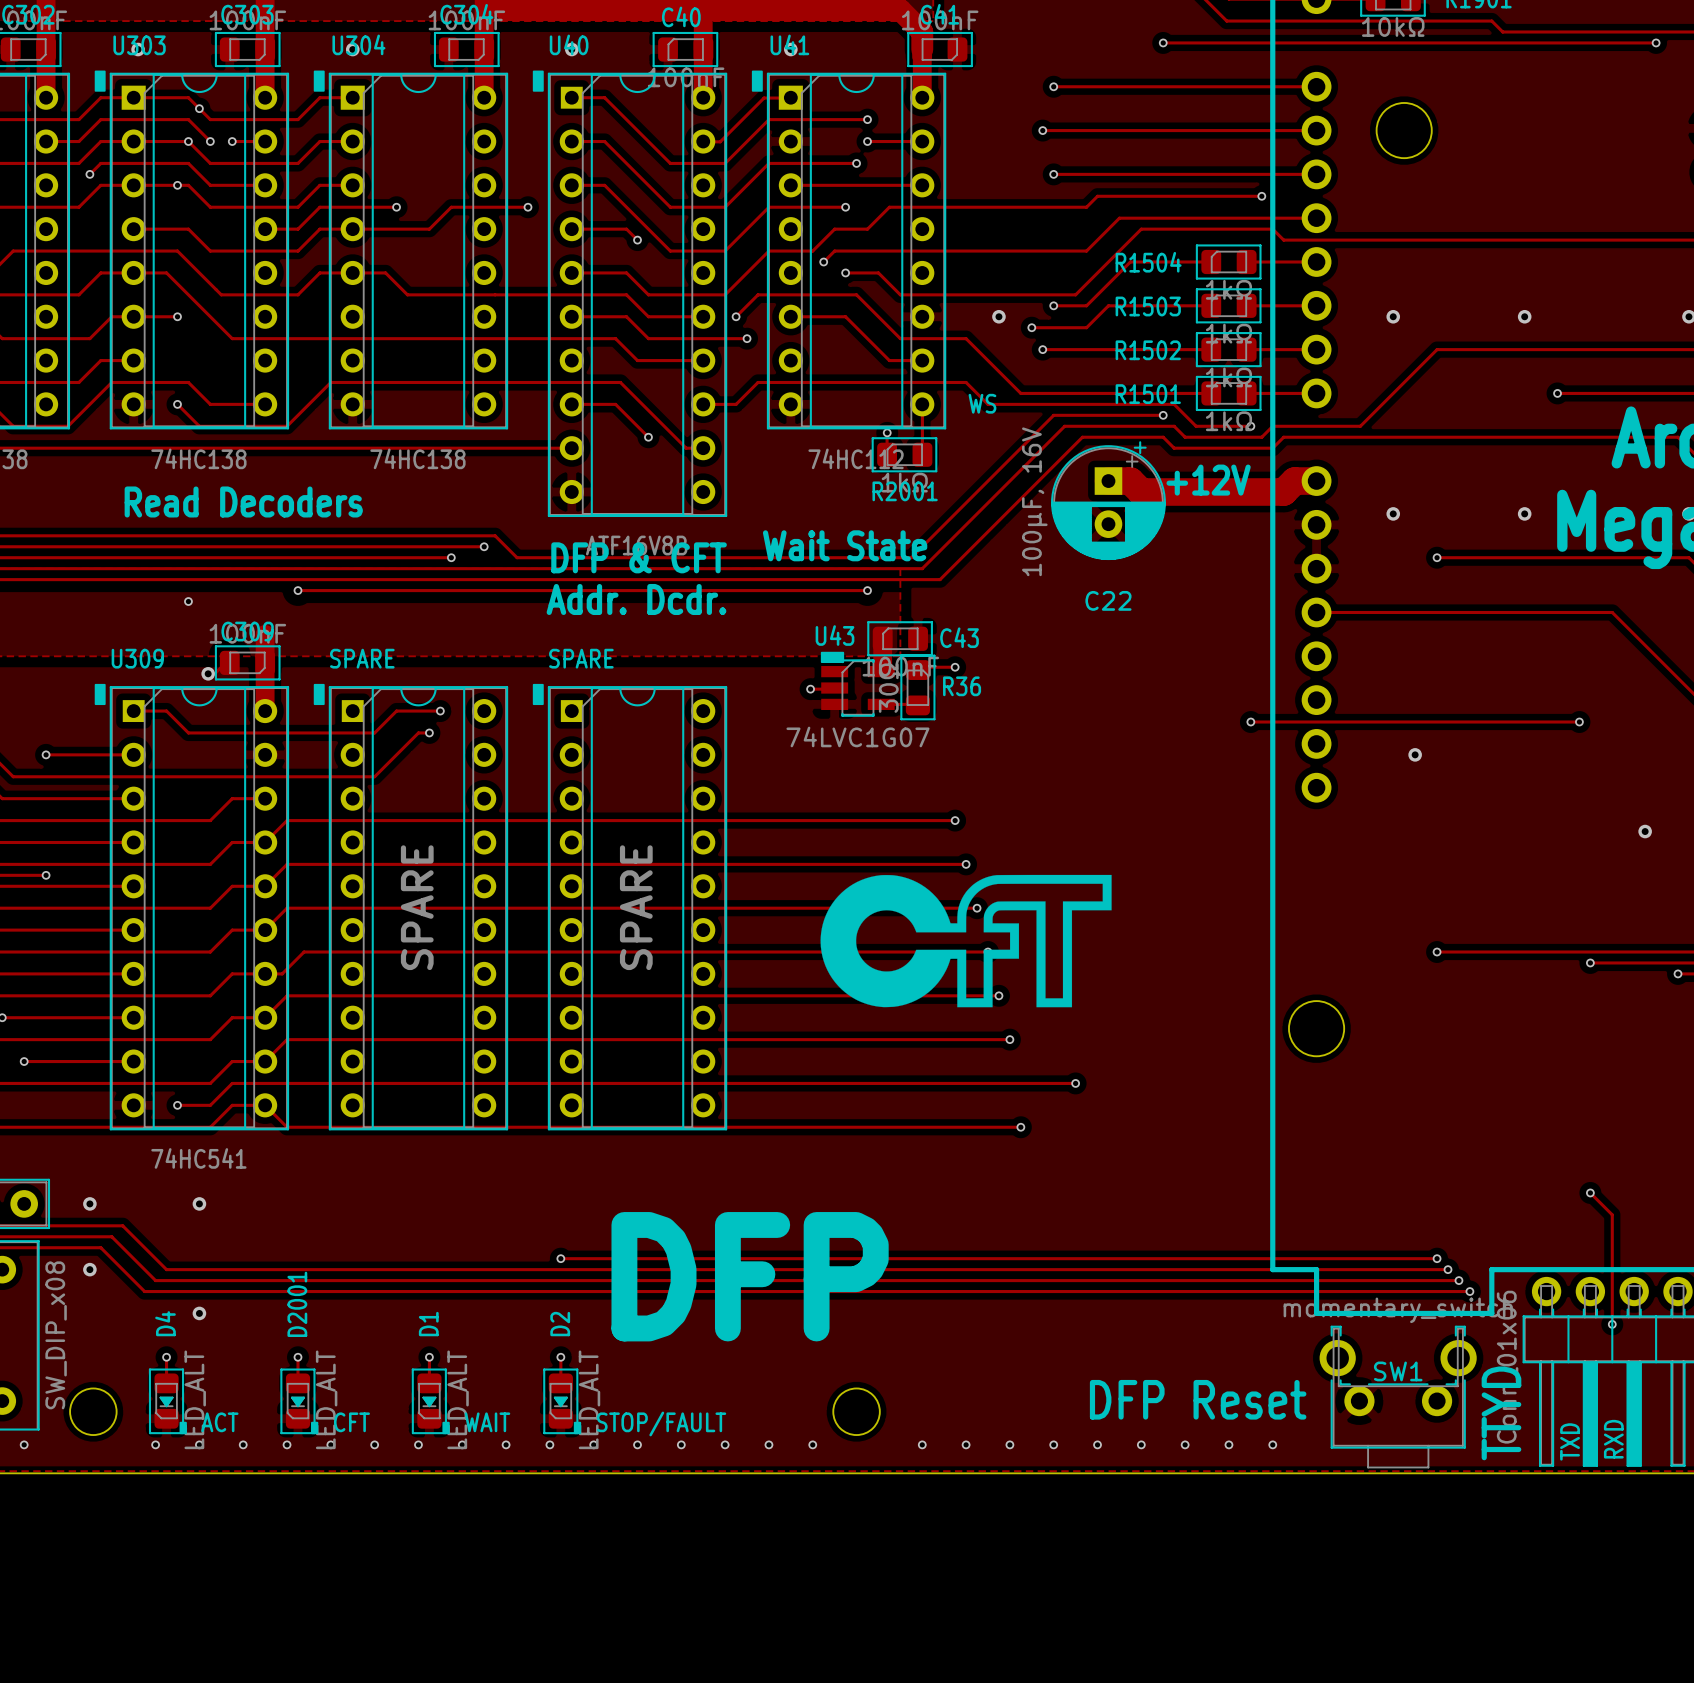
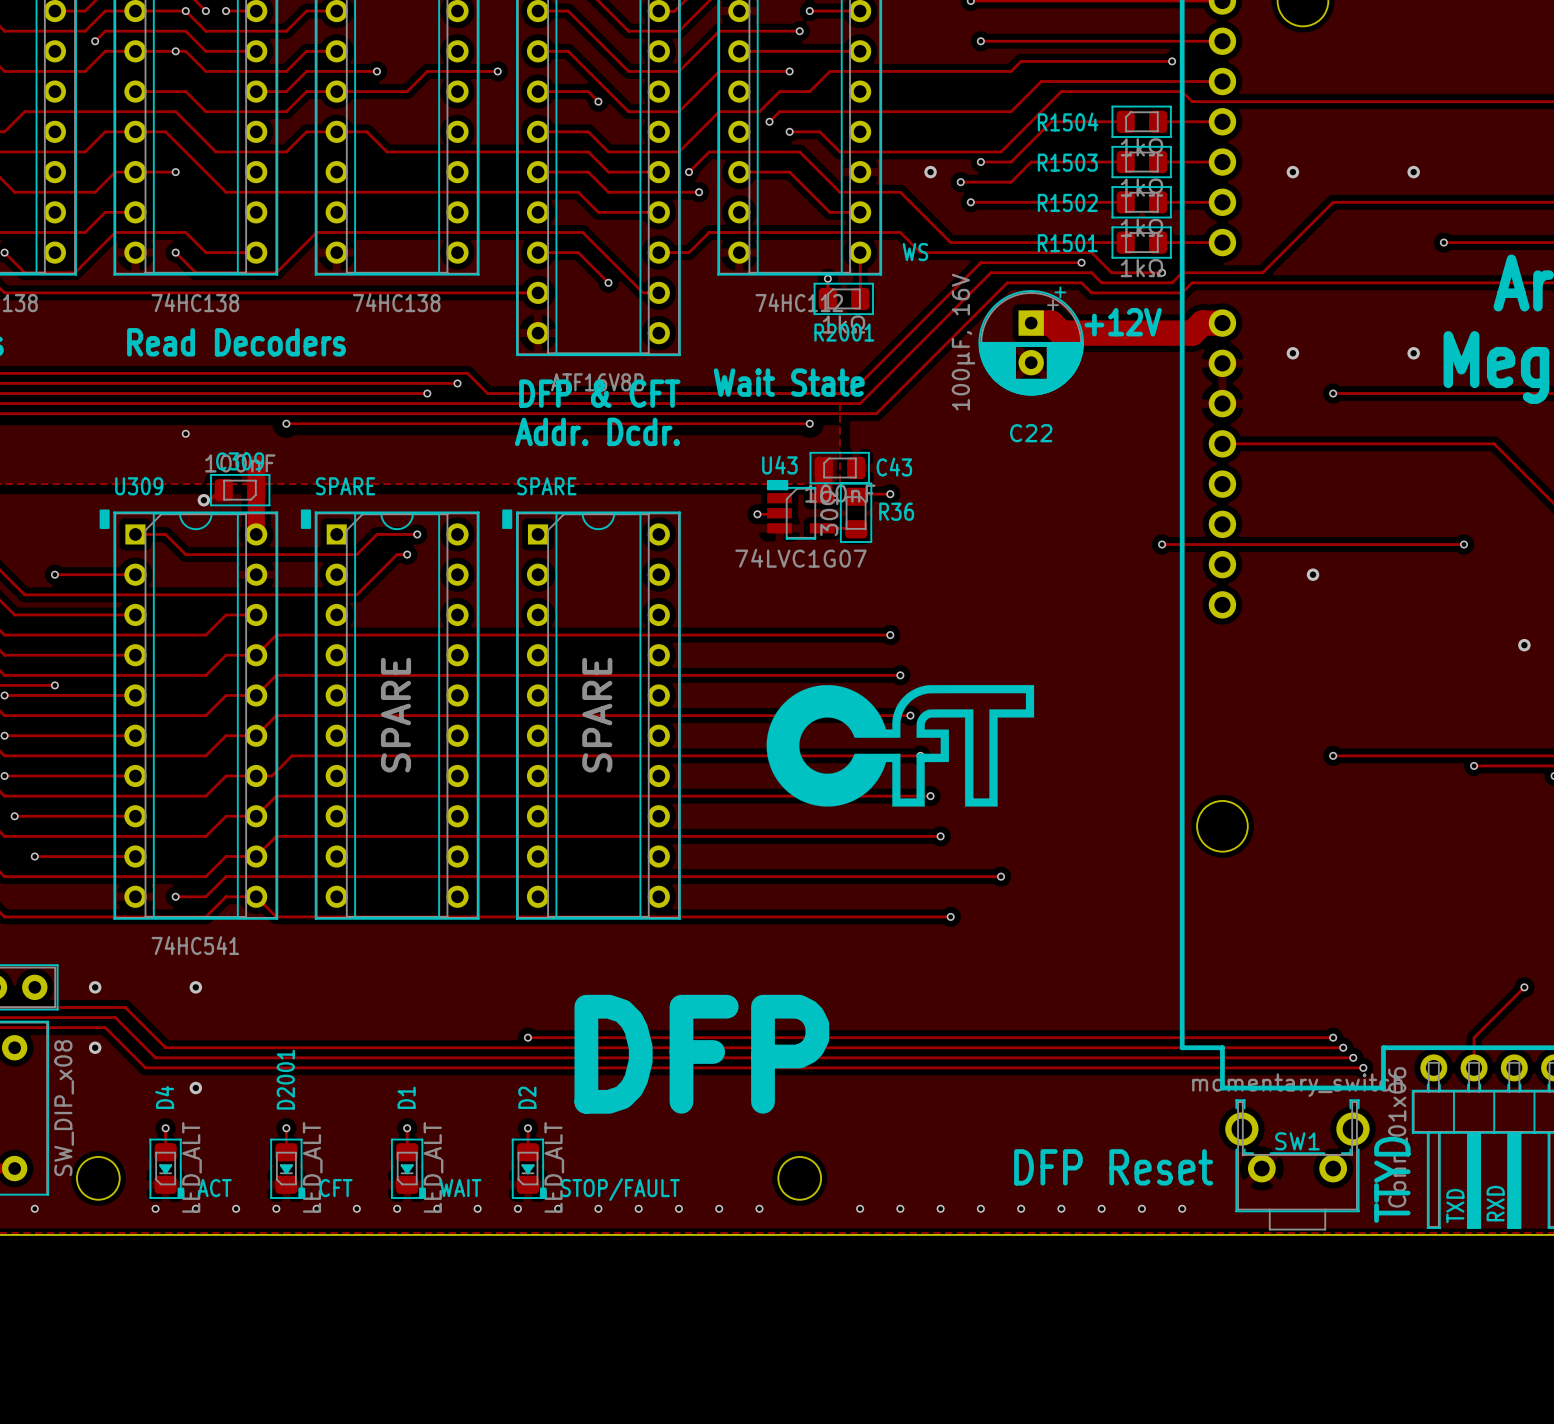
track: (1590, 1192) (1612, 1214) (1612, 1324) -> none
via position: (1590, 1192) -> (1524, 987)
track: none -> (1524, 987) (1474, 1037) (1474, 1067)
via: (1612, 1324) -> none

